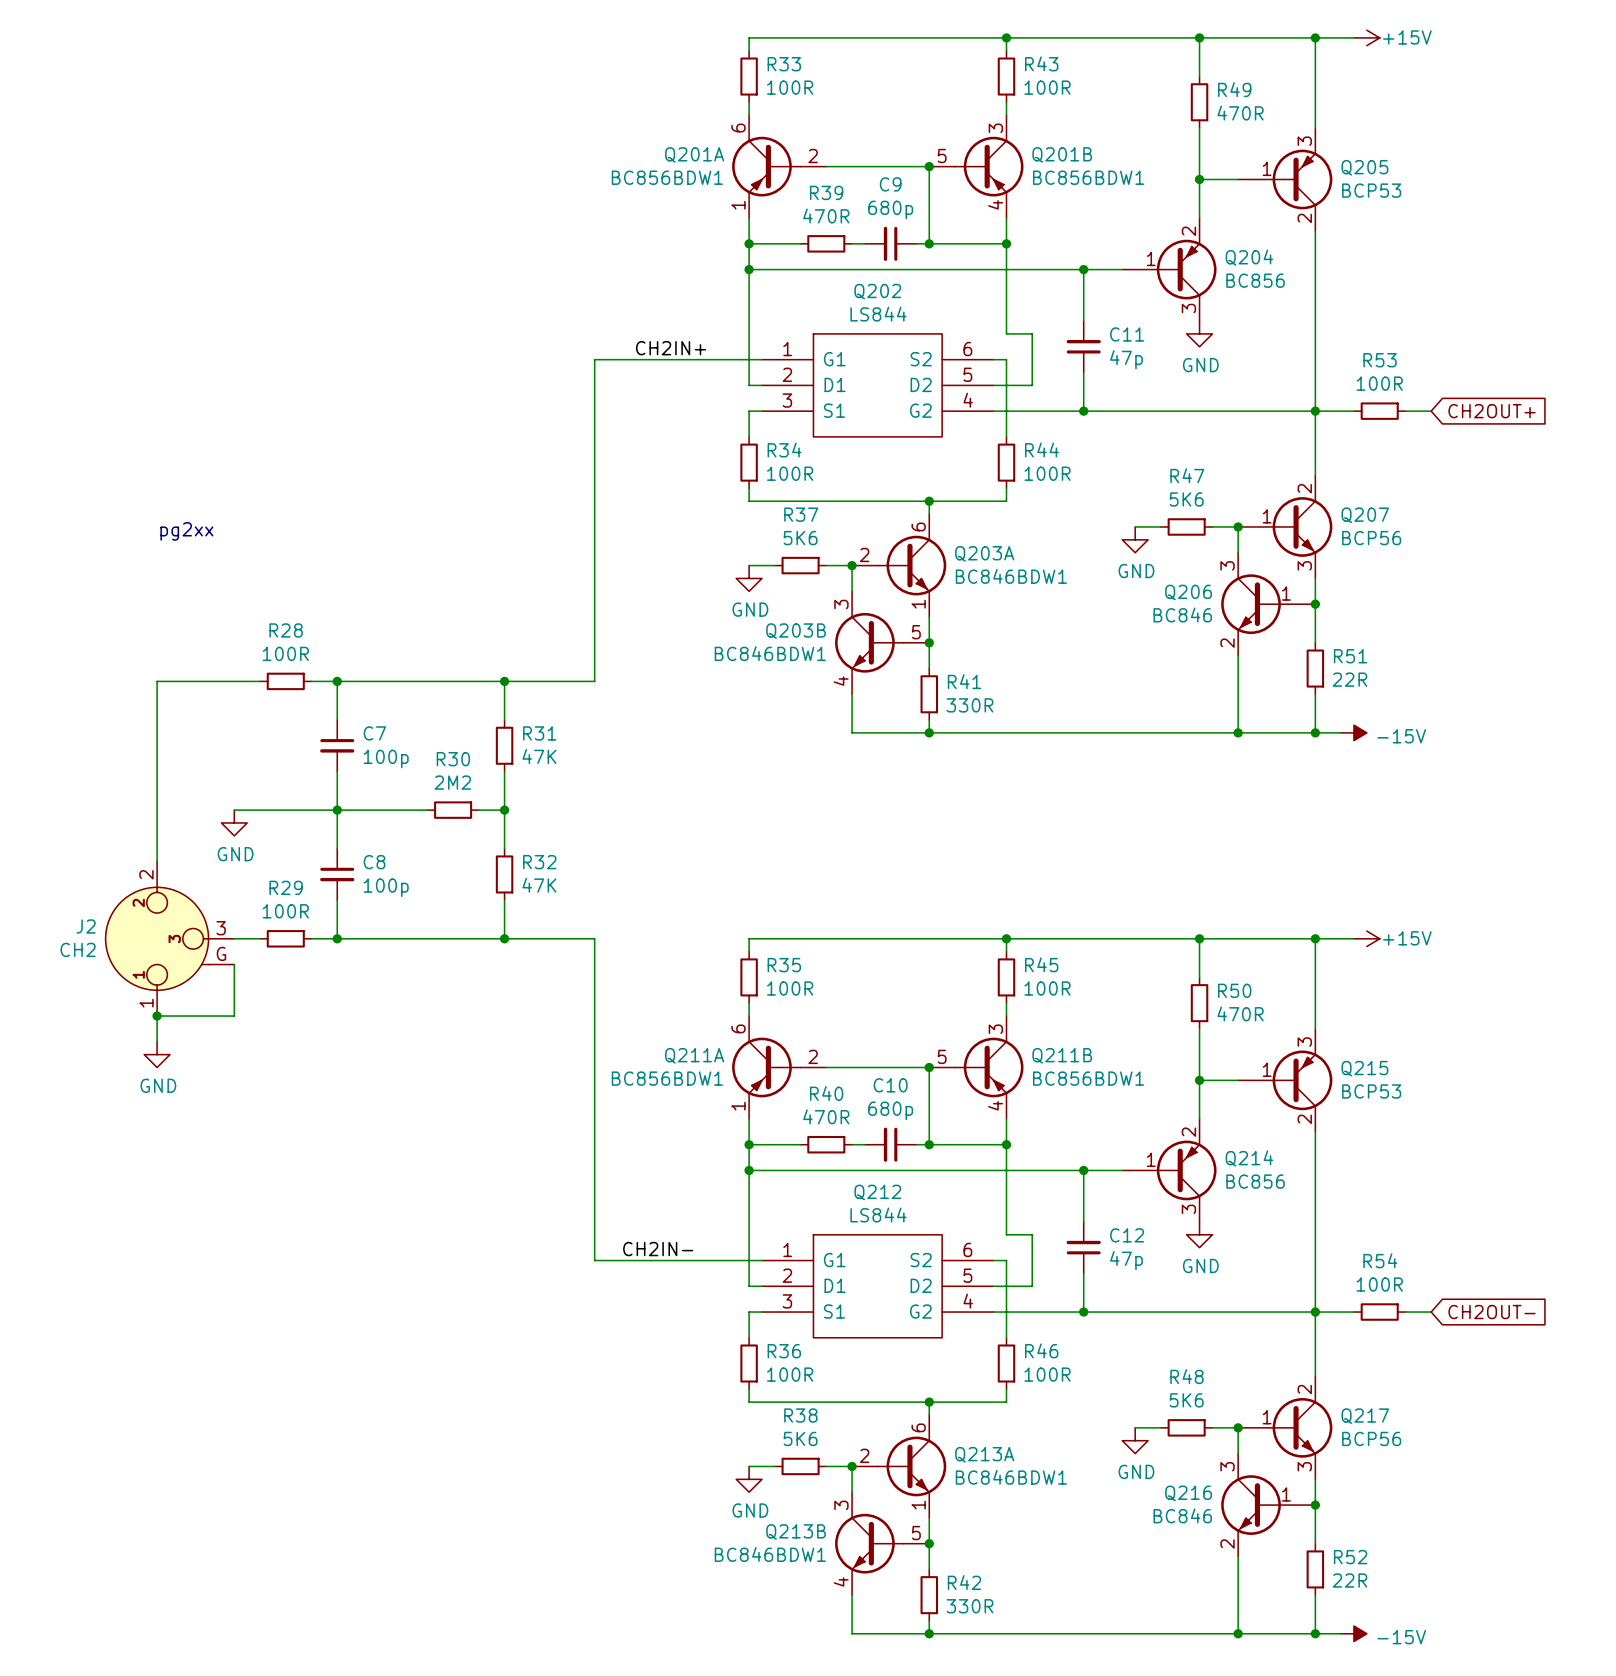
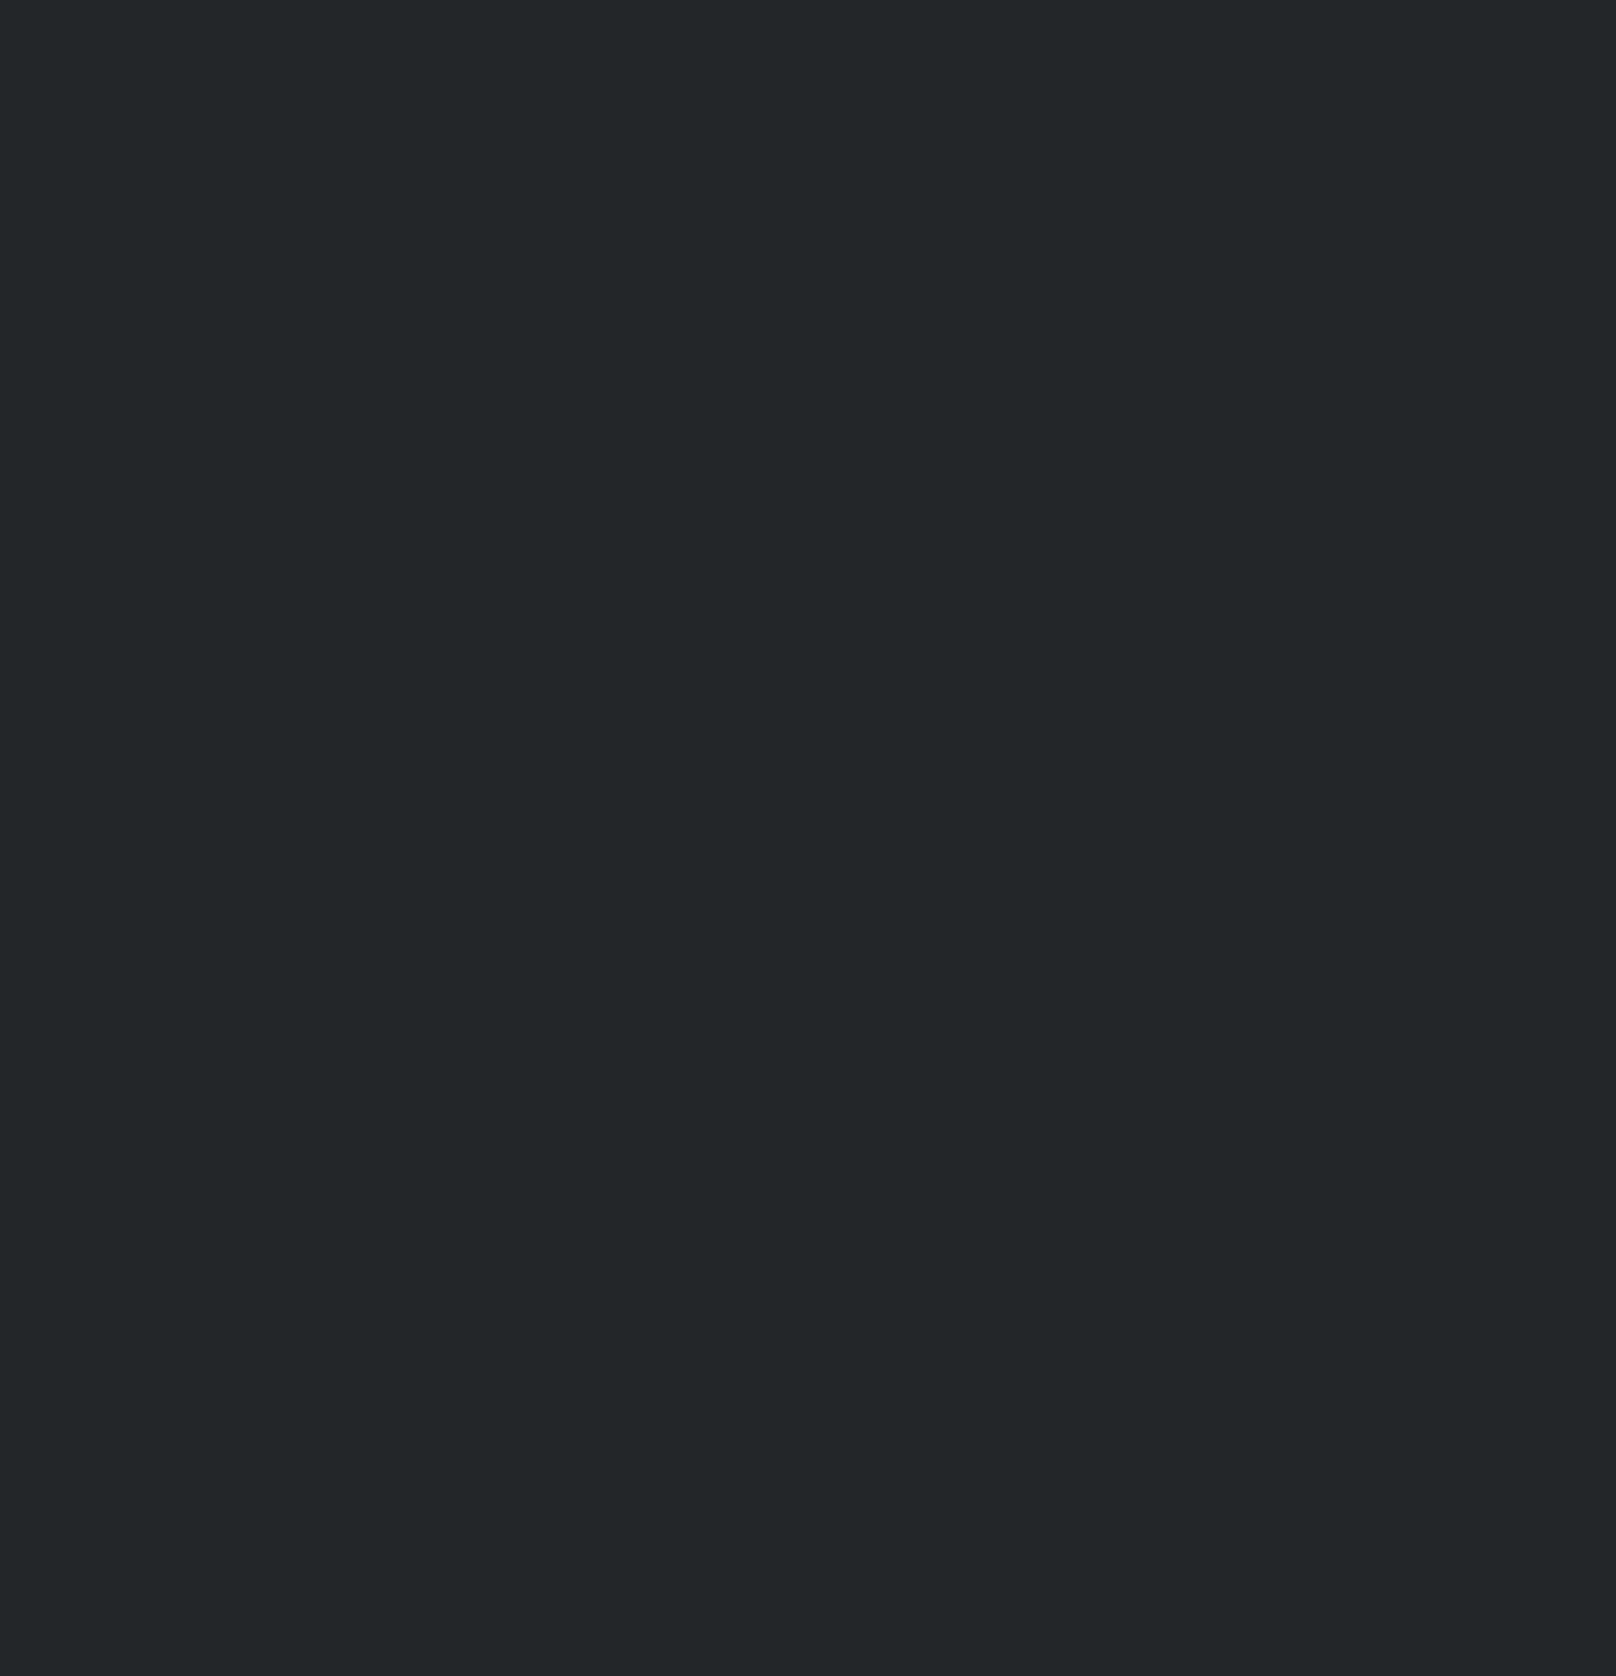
wire: (1006, 37) (1006, 50) -> none
junction: (1006, 37) -> none
wire: (1199, 37) (1199, 76) -> none
junction: (1199, 37) -> none
wire: (1315, 37) (1315, 128) -> none
junction: (1315, 37) -> none
wire: (1353, 37) (749, 37) (749, 50) -> none
power symbol: +15V (1366, 37) -> none
R33: 100R (749, 76) -> none
R43: 100R (1006, 76) -> none
wire: (749, 102) (749, 115) -> none
wire: (1006, 102) (1006, 115) -> none
R49: 470R (1199, 102) -> none
wire: (1199, 128) (1199, 218) -> none
Q201A: BC856BDW1 (779, 166) -> none
wire: (826, 166) (929, 166) (929, 243) -> none
junction: (929, 166) -> none
Q201B: BC856BDW1 (976, 166) -> none
wire: (1199, 179) (1238, 179) -> none
junction: (1199, 179) -> none
Q205: BCP53 (1285, 179) -> none
wire: (749, 218) (749, 385) (761, 385) -> none
wire: (1006, 218) (1006, 333) (1032, 333) (1032, 385) (993, 385) -> none
wire: (1315, 230) (1315, 475) -> none
wire: (749, 243) (800, 243) -> none
junction: (749, 243) -> none
R39: 470R (826, 243) -> none
wire: (852, 243) (864, 243) -> none
C9: 680p (890, 243) -> none
wire: (916, 243) (1006, 243) -> none
junction: (929, 243) -> none
junction: (1006, 243) -> none
wire: (749, 269) (1122, 269) -> none
junction: (749, 269) -> none
wire: (1083, 269) (1083, 321) -> none
junction: (1083, 269) -> none
Q204: BC856 (1169, 269) -> none
power symbol: GND (1199, 333) -> none
C11: 47p (1083, 346) -> none
label: CH2IN+ (671, 348) -> none
wire: (761, 359) (594, 359) (594, 681) (311, 681) -> none
wire: (993, 359) (1006, 359) (1006, 436) -> none
wire: (1083, 372) (1083, 411) -> none
Q202: LS844 (877, 385) -> none
wire: (761, 411) (749, 411) (749, 436) -> none
wire: (993, 411) (1353, 411) -> none
junction: (1083, 411) -> none
junction: (1315, 411) -> none
R53: 100R (1379, 411) -> none
wire: (1405, 411) (1431, 411) -> none
global label: CH2OUT+ (1492, 411) -> none
R34: 100R (749, 462) -> none
R44: 100R (1006, 462) -> none
wire: (749, 488) (749, 501) (1006, 501) (1006, 488) -> none
wire: (929, 501) (929, 514) -> none
junction: (929, 501) -> none
wire: (1135, 526) (1160, 526) -> none
R47: 5K6 (1186, 526) -> none
wire: (1212, 526) (1238, 526) (1238, 552) -> none
junction: (1238, 526) -> none
Q207: BCP56 (1285, 526) -> none
text: pg2xx (186, 531) -> none
power symbol: GND (1135, 539) -> none
wire: (749, 565) (774, 565) -> none
R37: 5K6 (800, 565) -> none
wire: (826, 565) (852, 565) (852, 591) -> none
junction: (852, 565) -> none
Q203A: BC846BDW1 (899, 565) -> none
power symbol: GND (749, 578) -> none
wire: (1315, 578) (1315, 642) -> none
Q206: BC846 (1268, 604) -> none
junction: (1315, 604) -> none
wire: (929, 617) (929, 668) -> none
Q203B: BC846BDW1 (882, 642) -> none
junction: (929, 642) -> none
wire: (1238, 655) (1238, 732) -> none
R51: 22R (1315, 668) -> none
wire: (260, 681) (157, 681) (157, 861) -> none
R28: 100R (285, 681) -> none
wire: (337, 681) (337, 720) -> none
junction: (337, 681) -> none
wire: (504, 681) (504, 720) -> none
junction: (504, 681) -> none
wire: (852, 694) (852, 732) (1341, 732) -> none
R41: 330R (929, 694) -> none
wire: (1315, 694) (1315, 732) -> none
wire: (929, 720) (929, 732) -> none
junction: (929, 732) -> none
junction: (1238, 732) -> none
junction: (1315, 732) -> none
power symbol: -15V (1353, 732) -> none
C7: 100p (337, 745) -> none
R31: 47K (504, 745) -> none
wire: (337, 771) (337, 848) -> none
wire: (504, 771) (504, 848) -> none
wire: (234, 810) (427, 810) -> none
junction: (337, 810) -> none
R30: 2M2 (453, 810) -> none
wire: (478, 810) (504, 810) -> none
junction: (504, 810) -> none
power symbol: GND (234, 822) -> none
C8: 100p (337, 874) -> none
R32: 47K (504, 874) -> none
wire: (337, 900) (337, 938) -> none
wire: (504, 900) (504, 938) -> none
J2: CH2 (169, 938) -> none
wire: (234, 938) (260, 938) -> none
R29: 100R (285, 938) -> none
wire: (311, 938) (594, 938) (594, 1260) (761, 1260) -> none
junction: (337, 938) -> none
junction: (504, 938) -> none
wire: (1006, 938) (1006, 951) -> none
junction: (1006, 938) -> none
wire: (1199, 938) (1199, 977) -> none
junction: (1199, 938) -> none
wire: (1315, 938) (1315, 1028) -> none
junction: (1315, 938) -> none
wire: (1353, 938) (749, 938) (749, 951) -> none
power symbol: +15V (1366, 938) -> none
wire: (234, 964) (234, 1016) (157, 1016) (157, 1041) -> none
R35: 100R (749, 977) -> none
R45: 100R (1006, 977) -> none
wire: (749, 1003) (749, 1016) -> none
wire: (1006, 1003) (1006, 1016) -> none
R50: 470R (1199, 1003) -> none
junction: (157, 1016) -> none
wire: (1199, 1028) (1199, 1118) -> none
power symbol: GND (157, 1054) -> none
Q211A: BC856BDW1 (779, 1067) -> none
wire: (826, 1067) (929, 1067) (929, 1144) -> none
junction: (929, 1067) -> none
Q211B: BC856BDW1 (976, 1067) -> none
wire: (1199, 1080) (1238, 1080) -> none
junction: (1199, 1080) -> none
Q215: BCP53 (1285, 1080) -> none
wire: (749, 1118) (749, 1286) (761, 1286) -> none
wire: (1006, 1118) (1006, 1234) (1032, 1234) (1032, 1286) (993, 1286) -> none
wire: (1315, 1131) (1315, 1376) -> none
wire: (749, 1144) (800, 1144) -> none
junction: (749, 1144) -> none
R40: 470R (826, 1144) -> none
wire: (852, 1144) (864, 1144) -> none
C10: 680p (890, 1144) -> none
wire: (916, 1144) (1006, 1144) -> none
junction: (929, 1144) -> none
junction: (1006, 1144) -> none
wire: (749, 1170) (1122, 1170) -> none
junction: (749, 1170) -> none
wire: (1083, 1170) (1083, 1221) -> none
junction: (1083, 1170) -> none
Q214: BC856 (1169, 1170) -> none
power symbol: GND (1199, 1234) -> none
C12: 47p (1083, 1247) -> none
label: CH2IN- (658, 1249) -> none
wire: (993, 1260) (1006, 1260) (1006, 1337) -> none
wire: (1083, 1273) (1083, 1312) -> none
Q212: LS844 (877, 1286) -> none
wire: (761, 1312) (749, 1312) (749, 1337) -> none
wire: (993, 1312) (1353, 1312) -> none
junction: (1083, 1312) -> none
junction: (1315, 1312) -> none
R54: 100R (1379, 1312) -> none
wire: (1405, 1312) (1431, 1312) -> none
global label: CH2OUT- (1492, 1312) -> none
R36: 100R (749, 1363) -> none
R46: 100R (1006, 1363) -> none
wire: (749, 1389) (749, 1402) (1006, 1402) (1006, 1389) -> none
wire: (929, 1402) (929, 1414) -> none
junction: (929, 1402) -> none
wire: (1135, 1427) (1160, 1427) -> none
R48: 5K6 (1186, 1427) -> none
wire: (1212, 1427) (1238, 1427) (1238, 1453) -> none
junction: (1238, 1427) -> none
Q217: BCP56 (1285, 1427) -> none
power symbol: GND (1135, 1440) -> none
wire: (749, 1466) (774, 1466) -> none
R38: 5K6 (800, 1466) -> none
wire: (826, 1466) (852, 1466) (852, 1492) -> none
junction: (852, 1466) -> none
Q213A: BC846BDW1 (899, 1466) -> none
power symbol: GND (749, 1479) -> none
wire: (1315, 1479) (1315, 1543) -> none
Q216: BC846 (1268, 1505) -> none
junction: (1315, 1505) -> none
wire: (929, 1517) (929, 1569) -> none
Q213B: BC846BDW1 (882, 1543) -> none
junction: (929, 1543) -> none
wire: (1238, 1556) (1238, 1633) -> none
R52: 22R (1315, 1569) -> none
wire: (852, 1595) (852, 1633) (1341, 1633) -> none
R42: 330R (929, 1595) -> none
wire: (1315, 1595) (1315, 1633) -> none
wire: (929, 1620) (929, 1633) -> none
junction: (929, 1633) -> none
junction: (1238, 1633) -> none
junction: (1315, 1633) -> none
power symbol: -15V (1353, 1633) -> none

